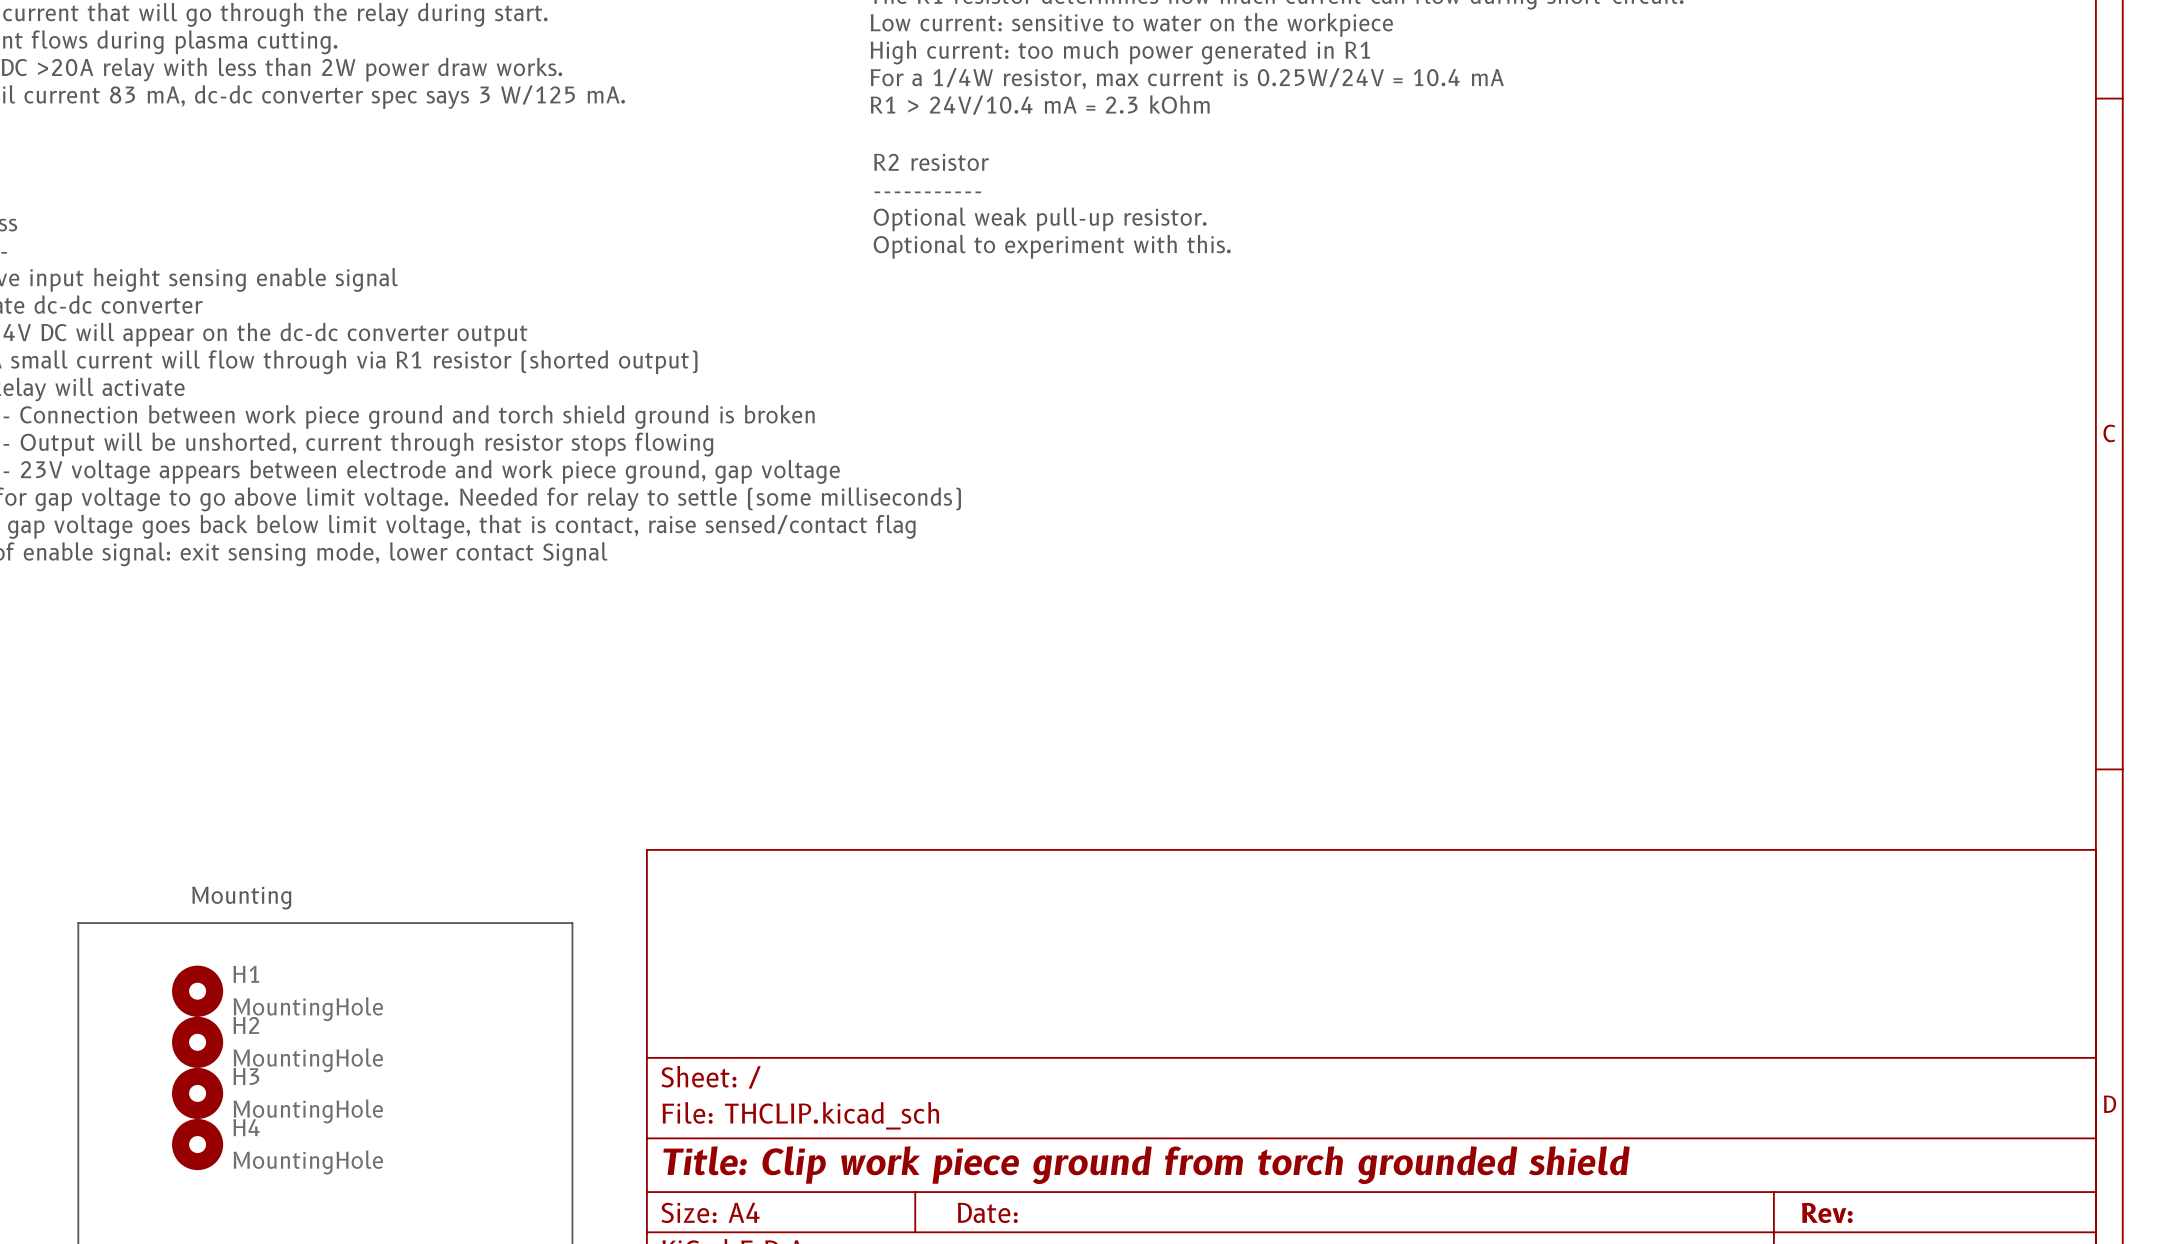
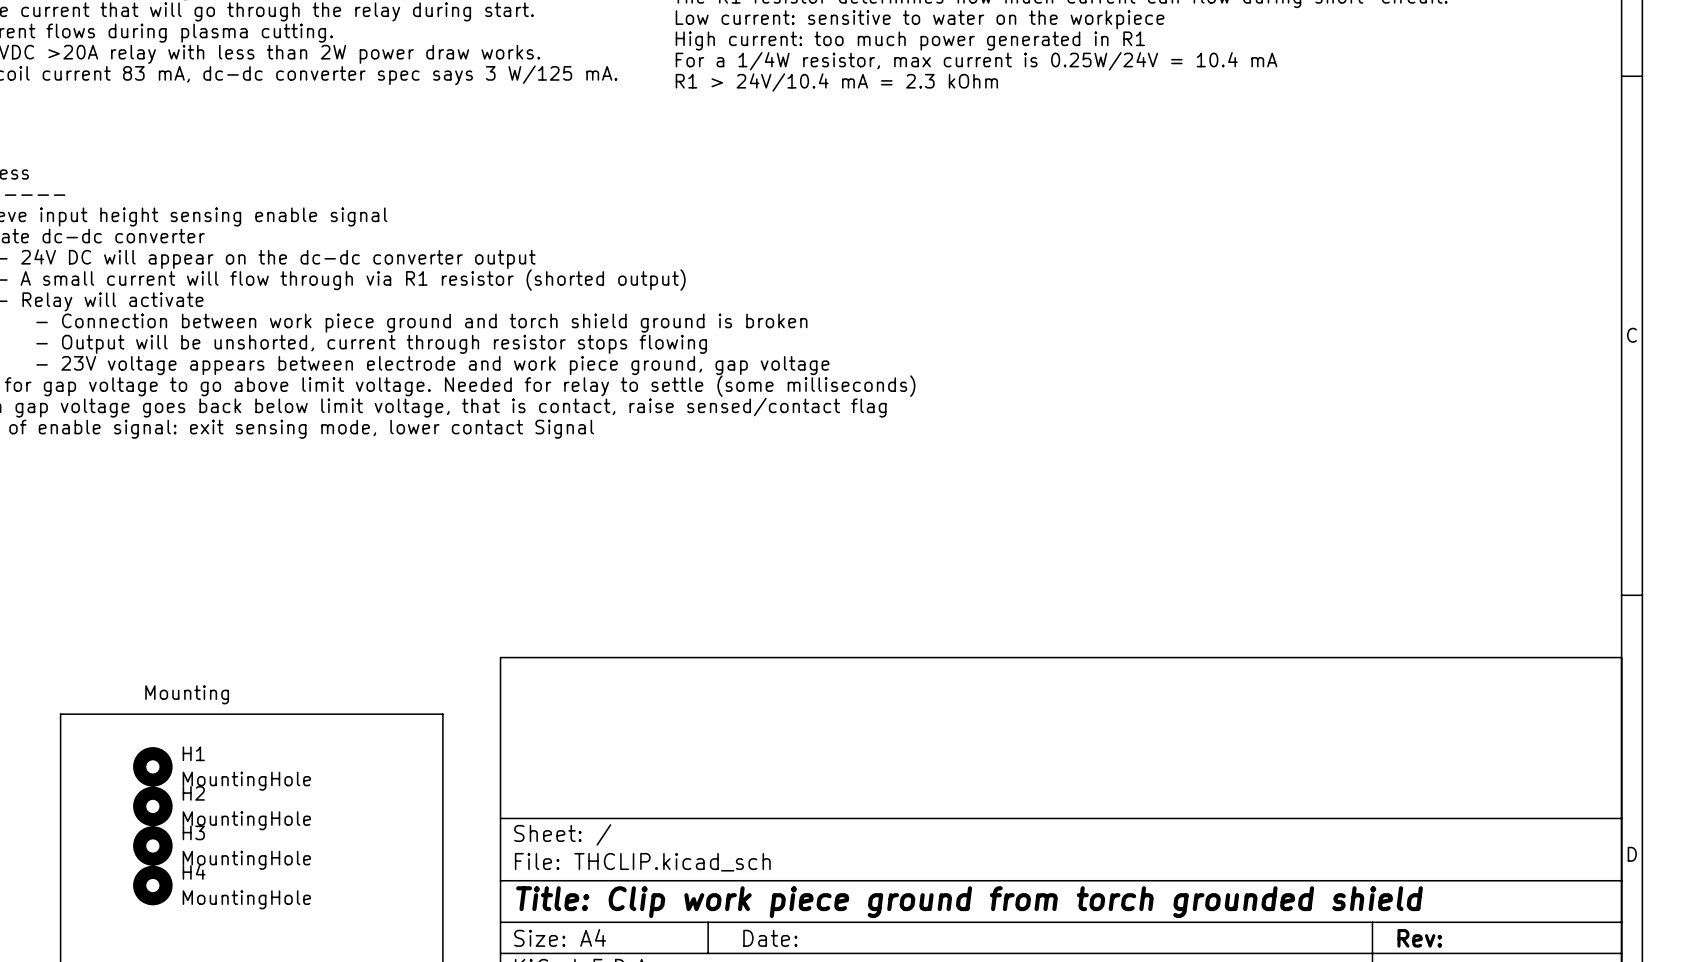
text: R2 resistor (931, 162) -> none
text: ----------- (927, 192) -> none
text: Optional weak pull-up resistor. (1040, 219) -> none
text: Optional to experiment with this. (1052, 246) -> none

